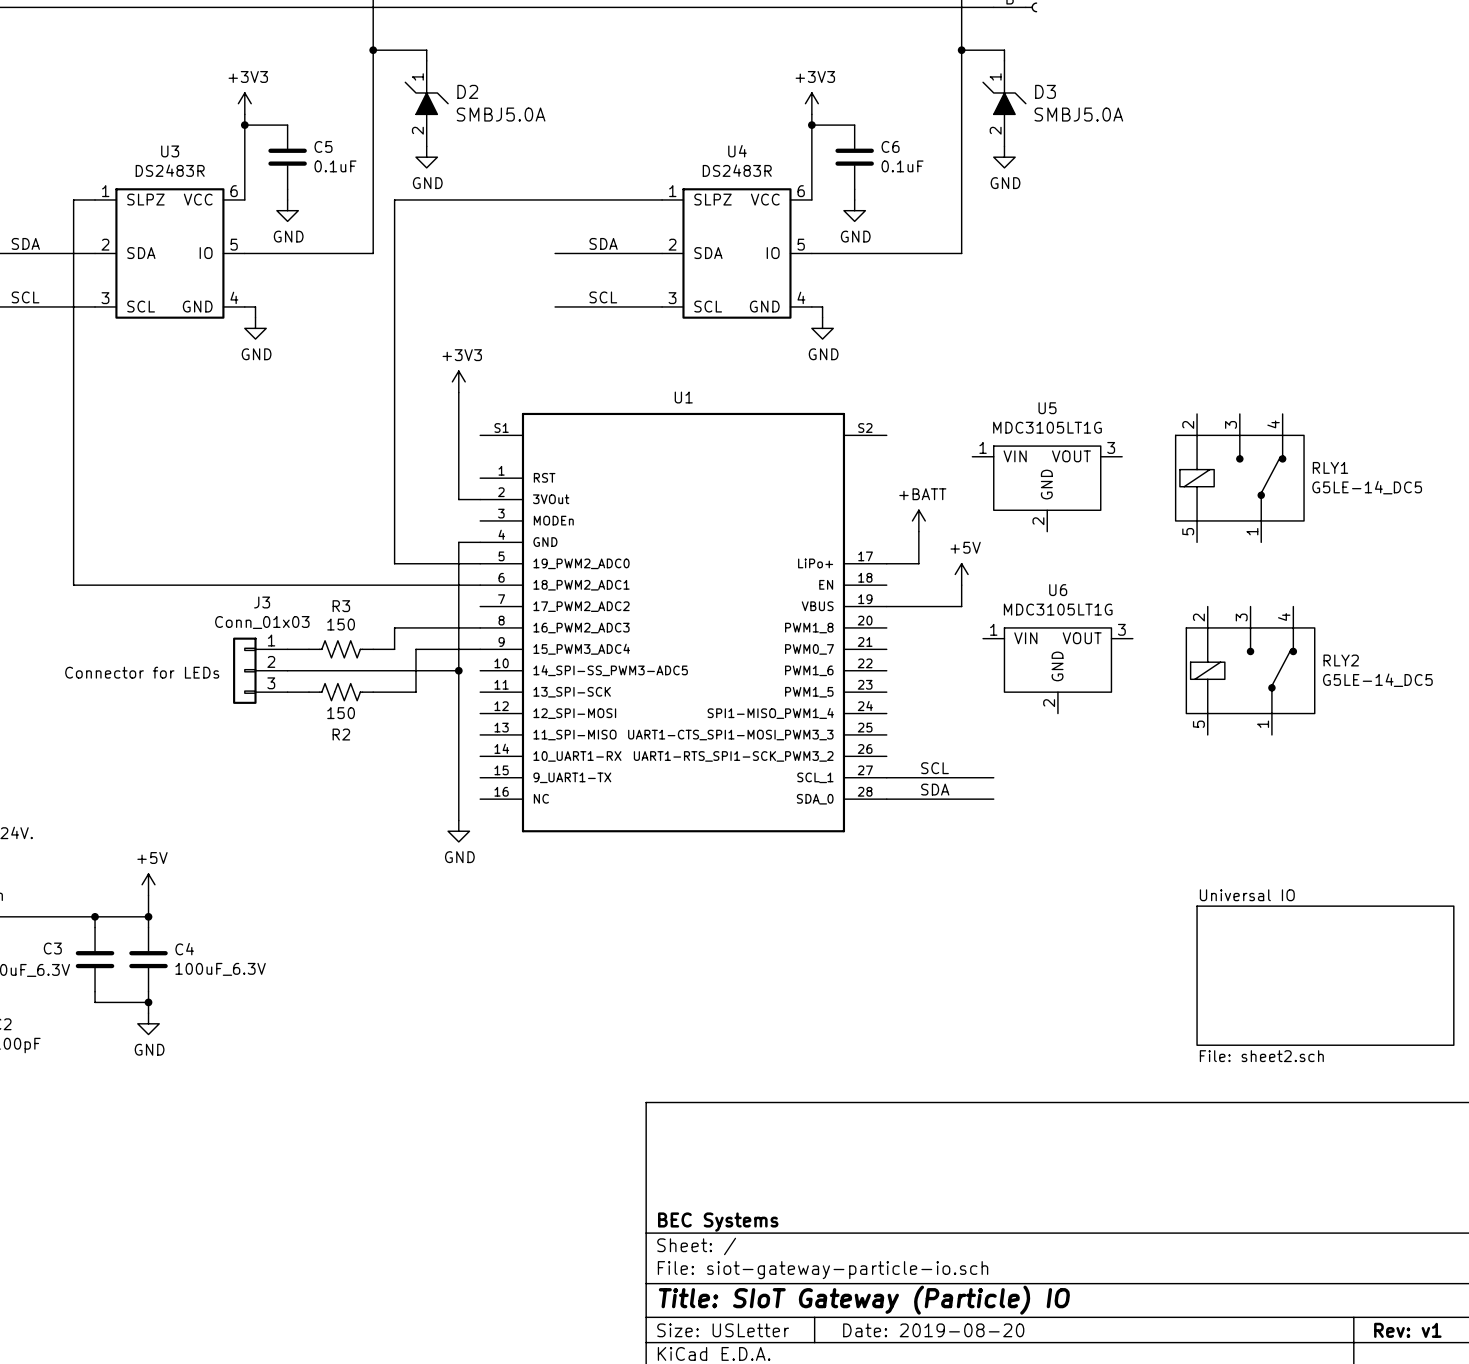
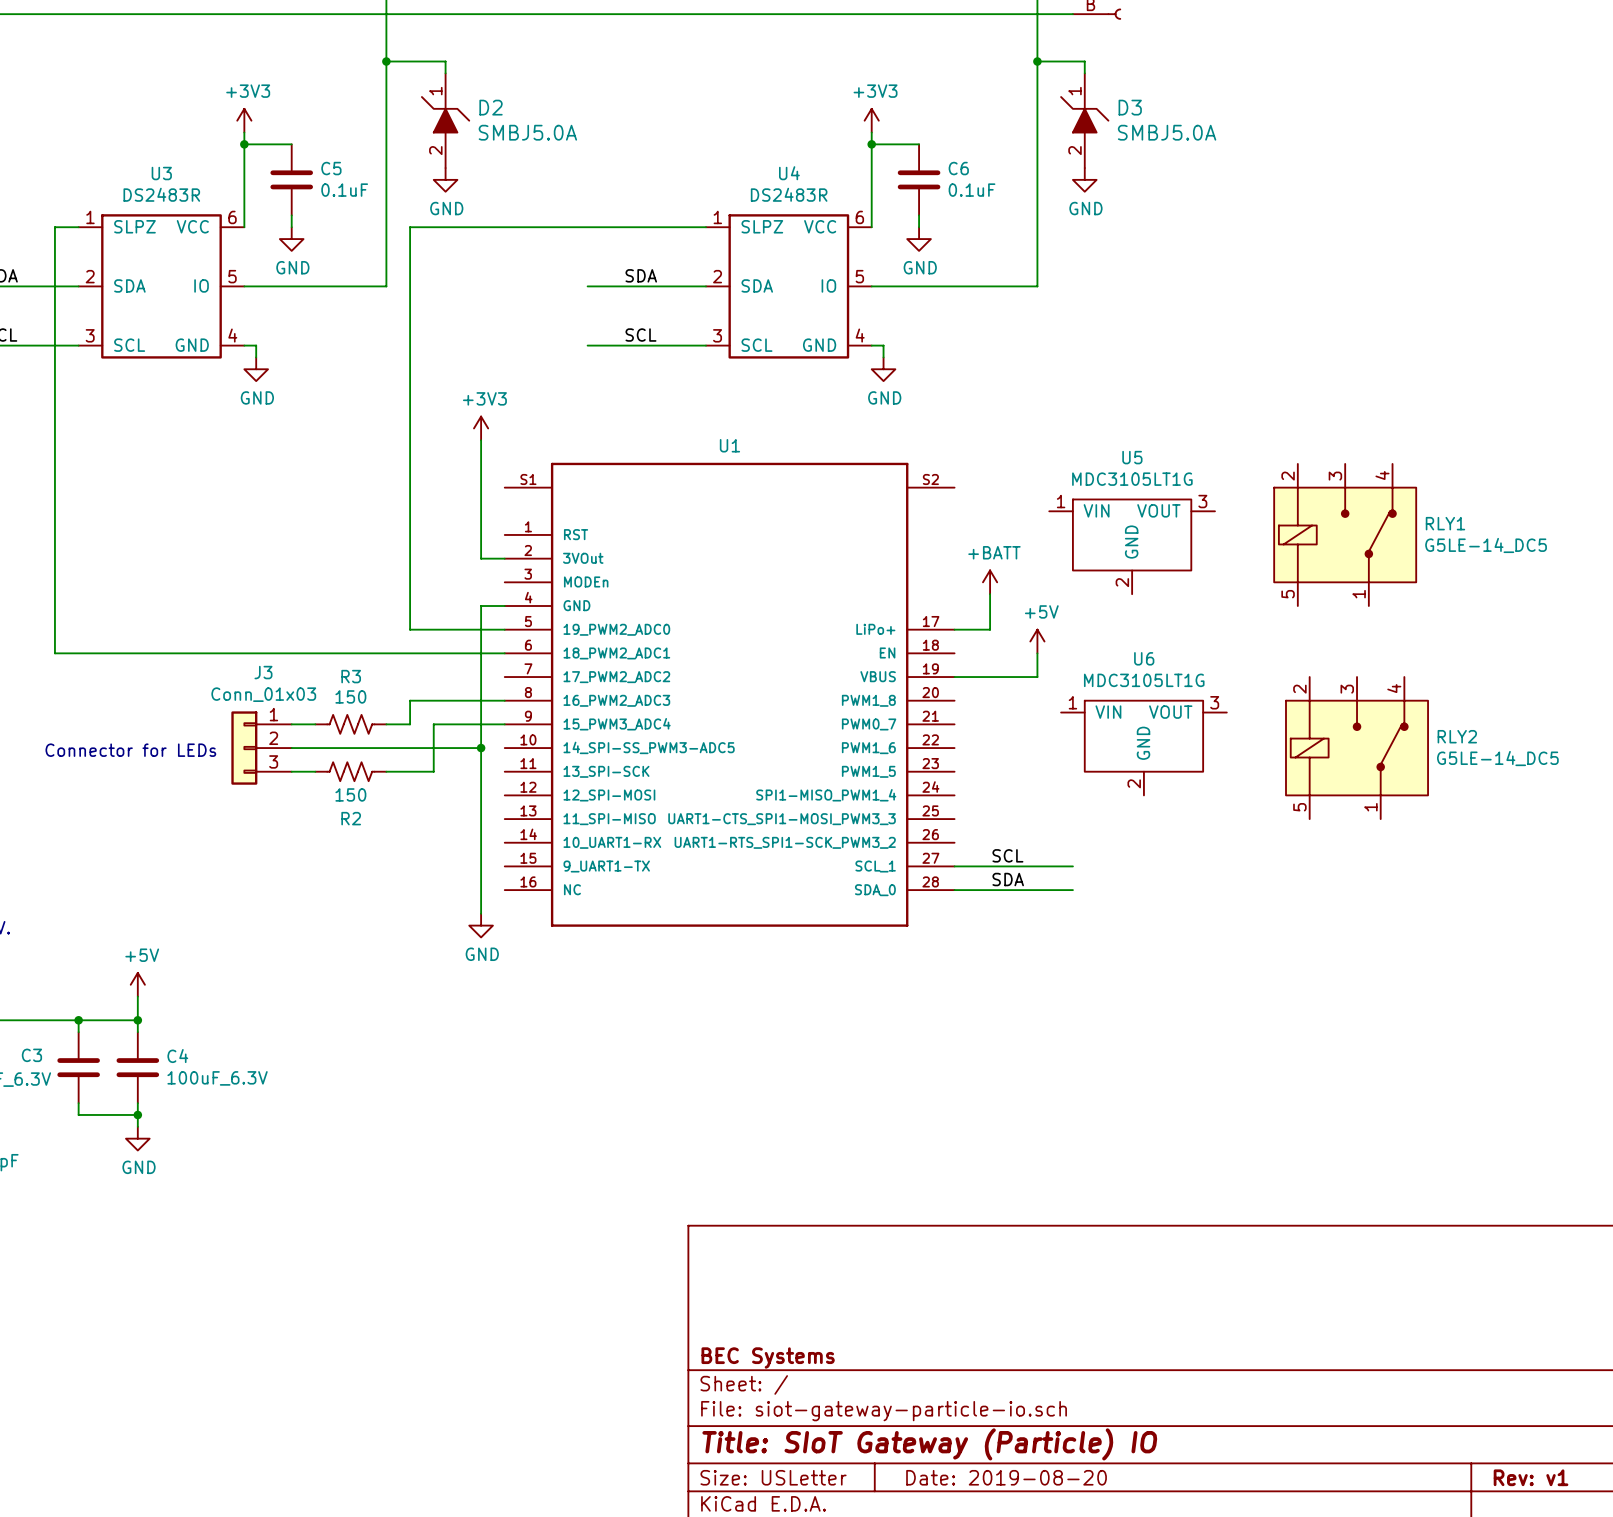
sheet Universal IO: File: sheet2.sch (1325, 975) -> none

